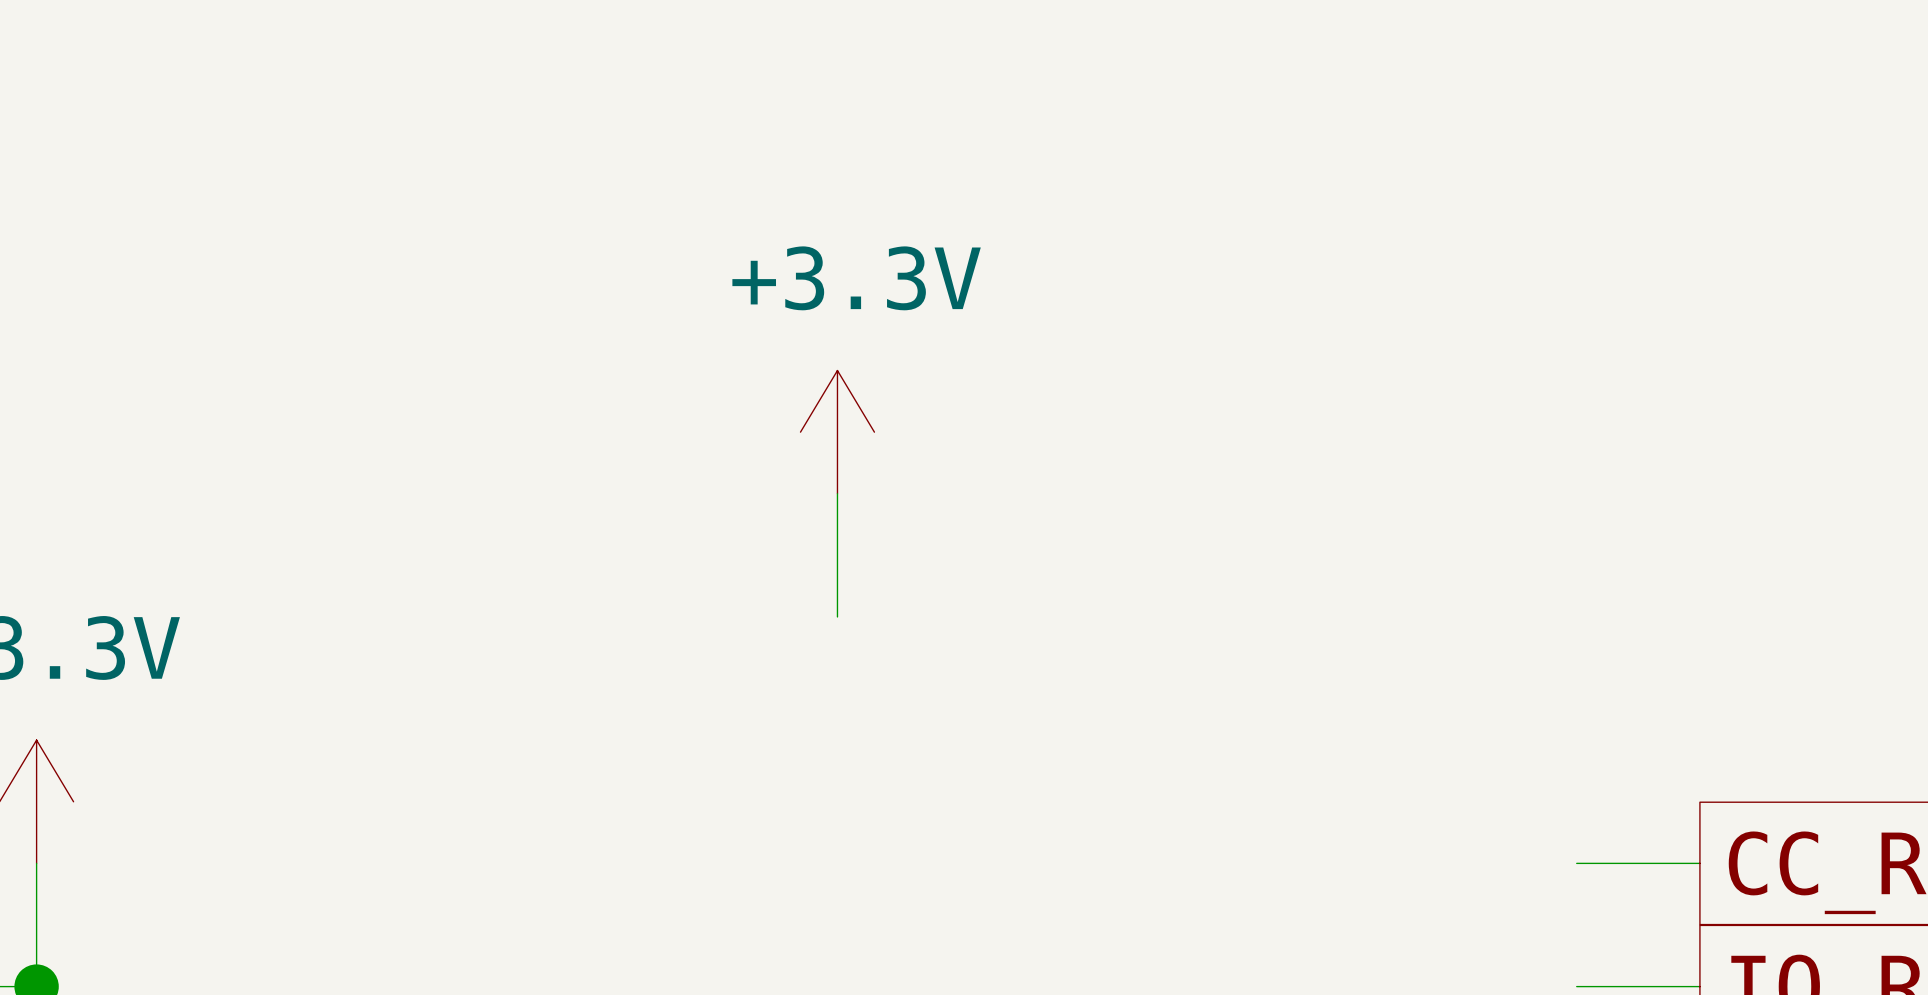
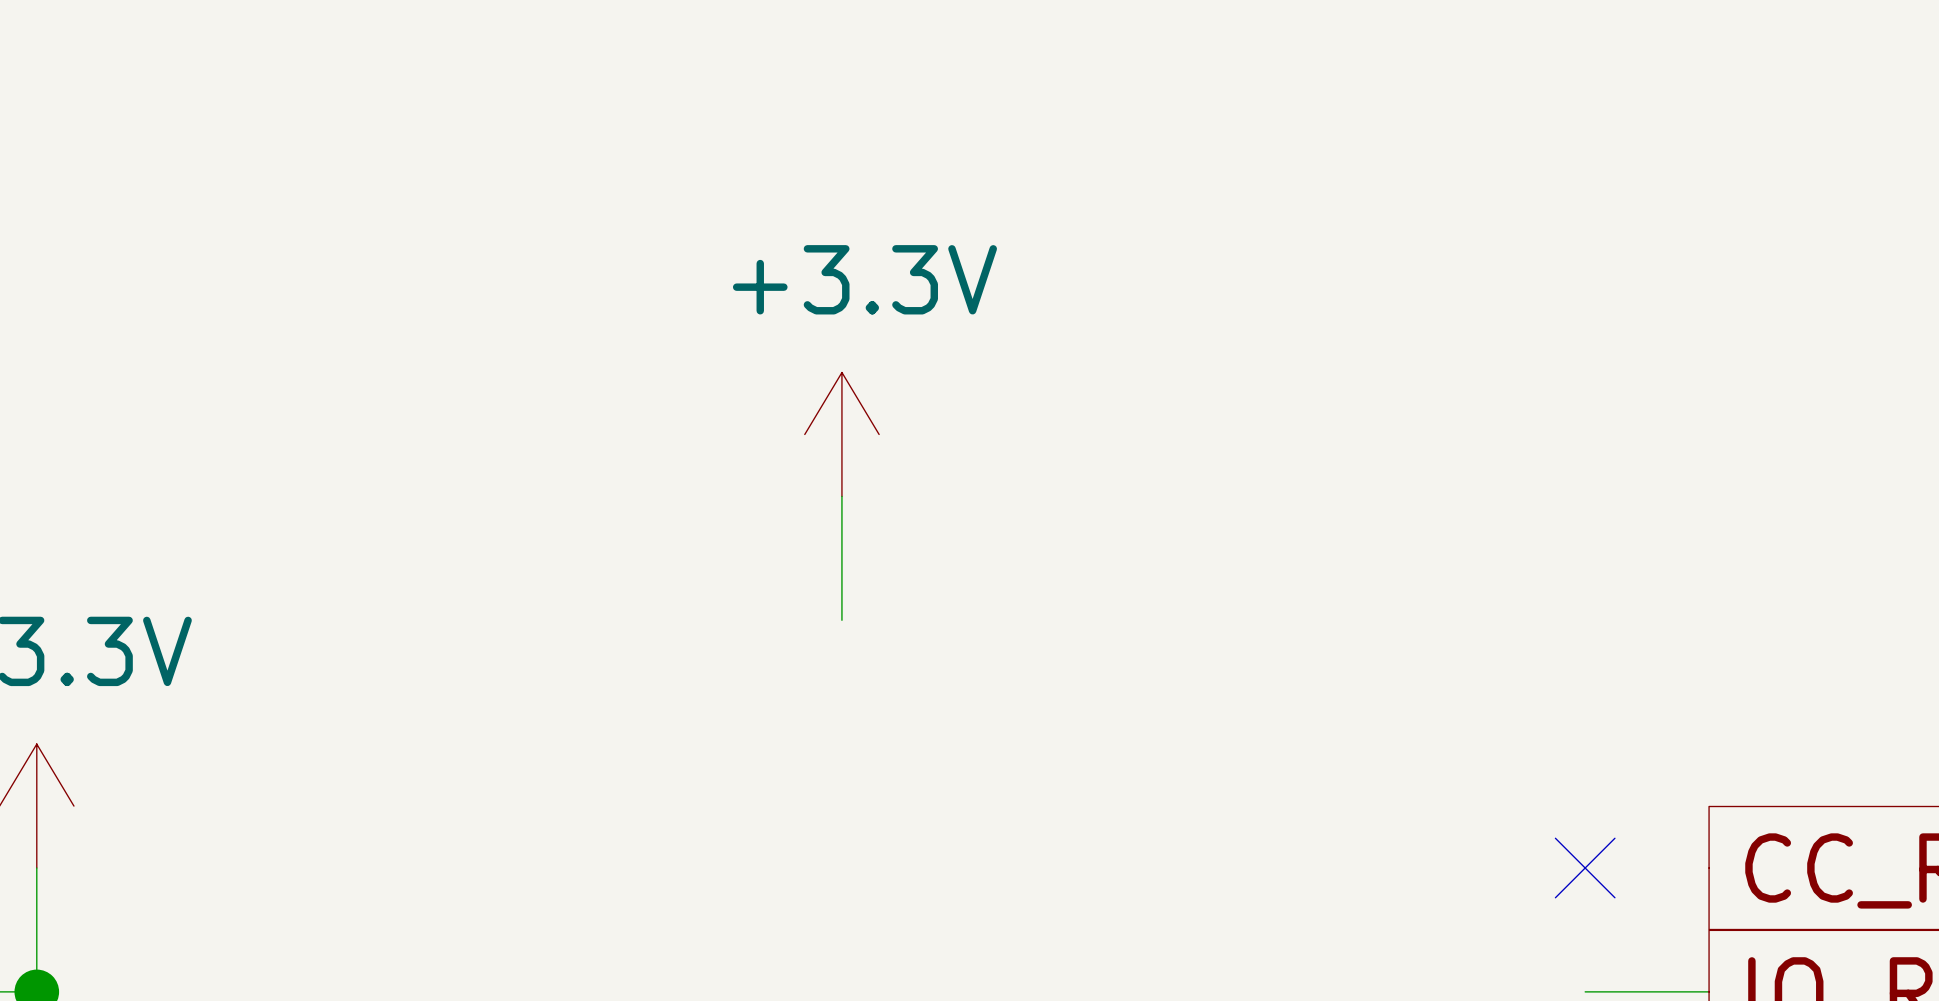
wire: (1576, 863) (1699, 863) -> none
no-connect mark: none -> (1585, 868)

